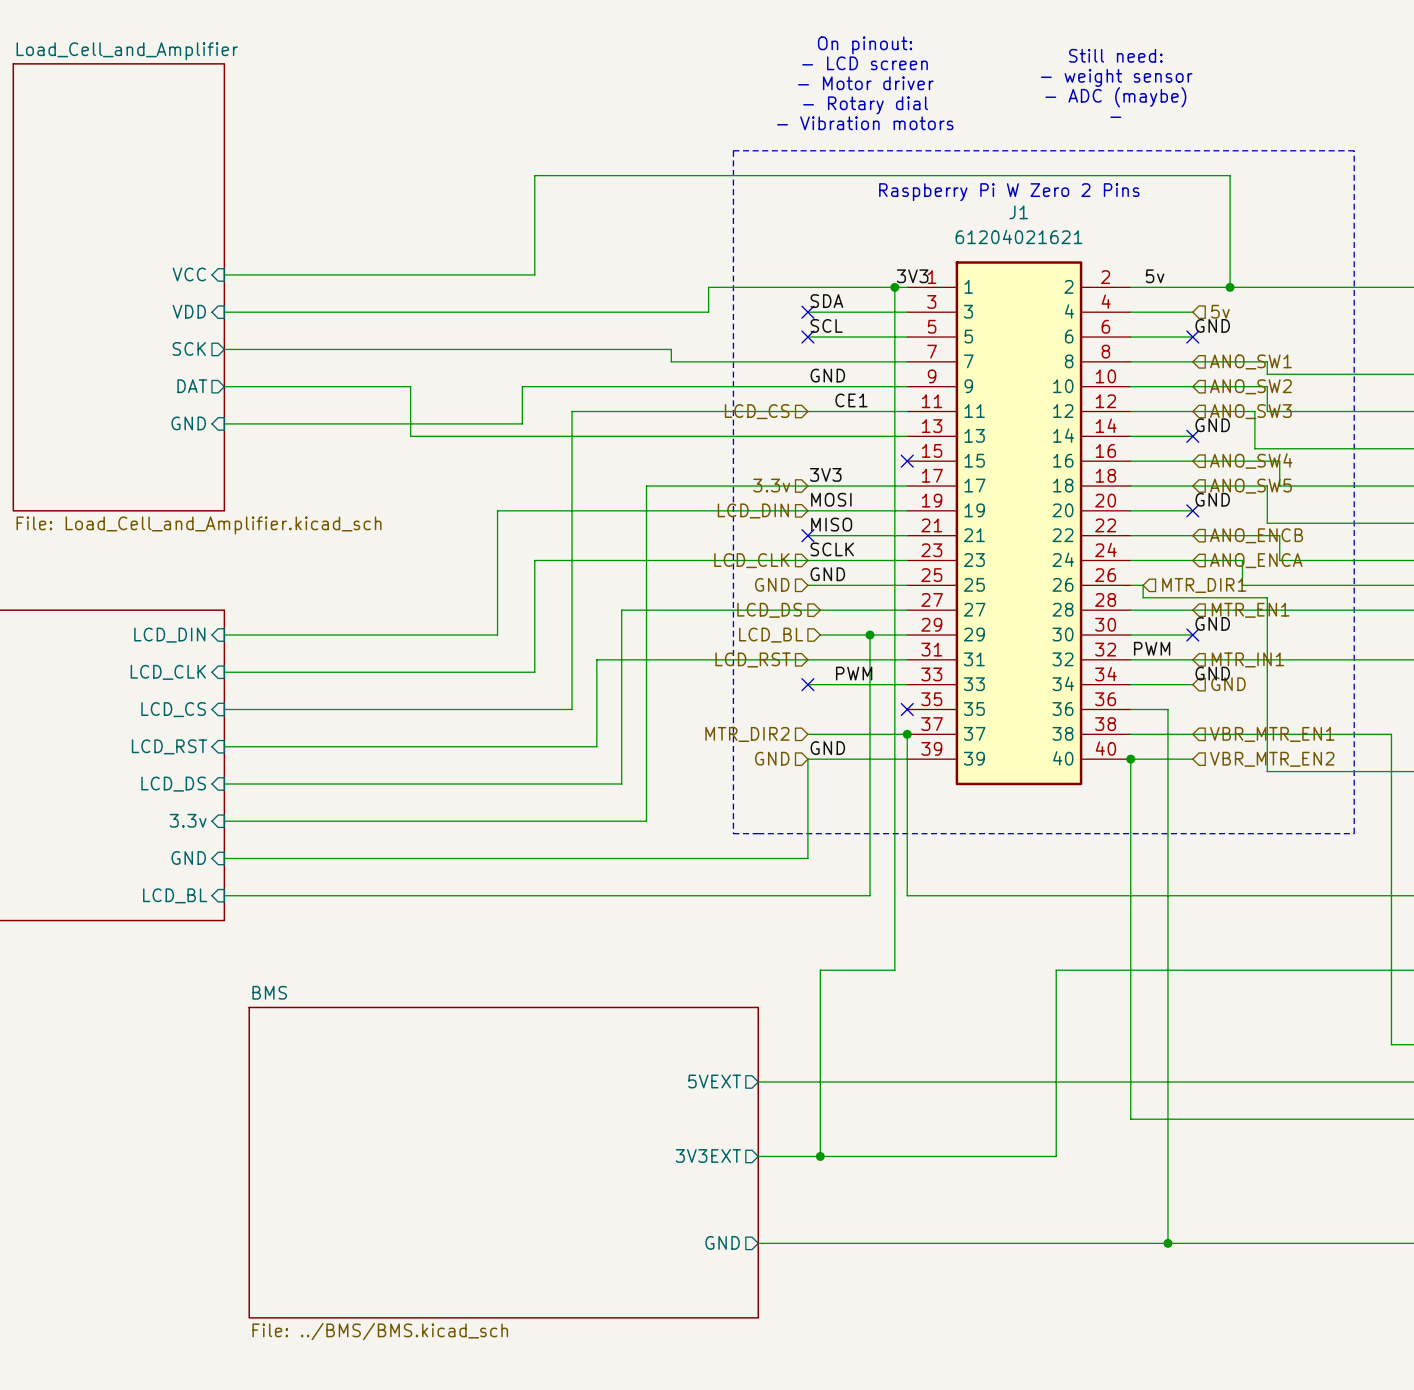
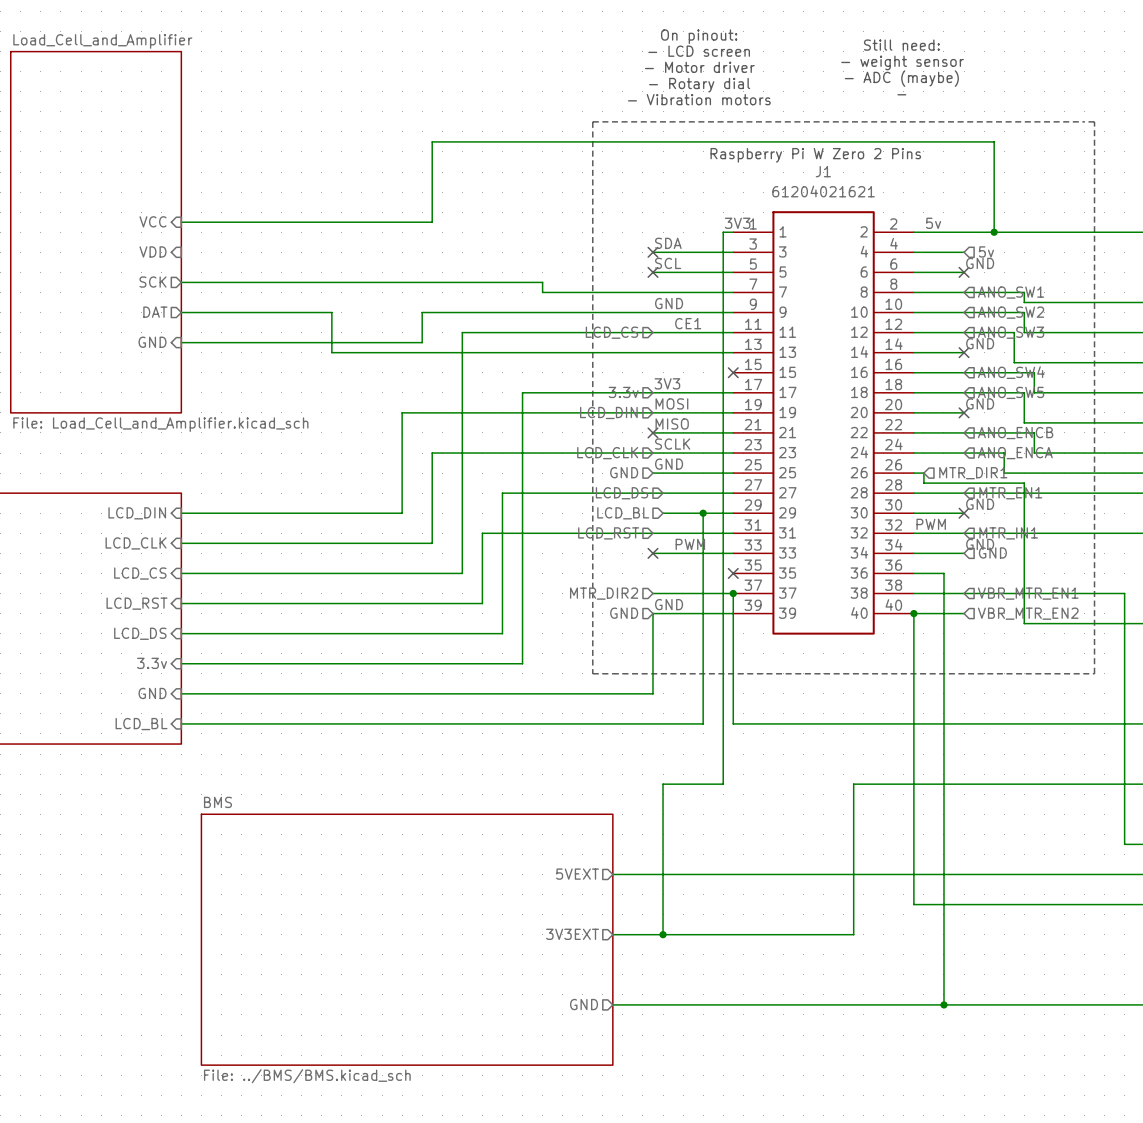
wire: (894, 287) (708, 287) (708, 312) (224, 312) -> none
junction: (894, 287) -> none

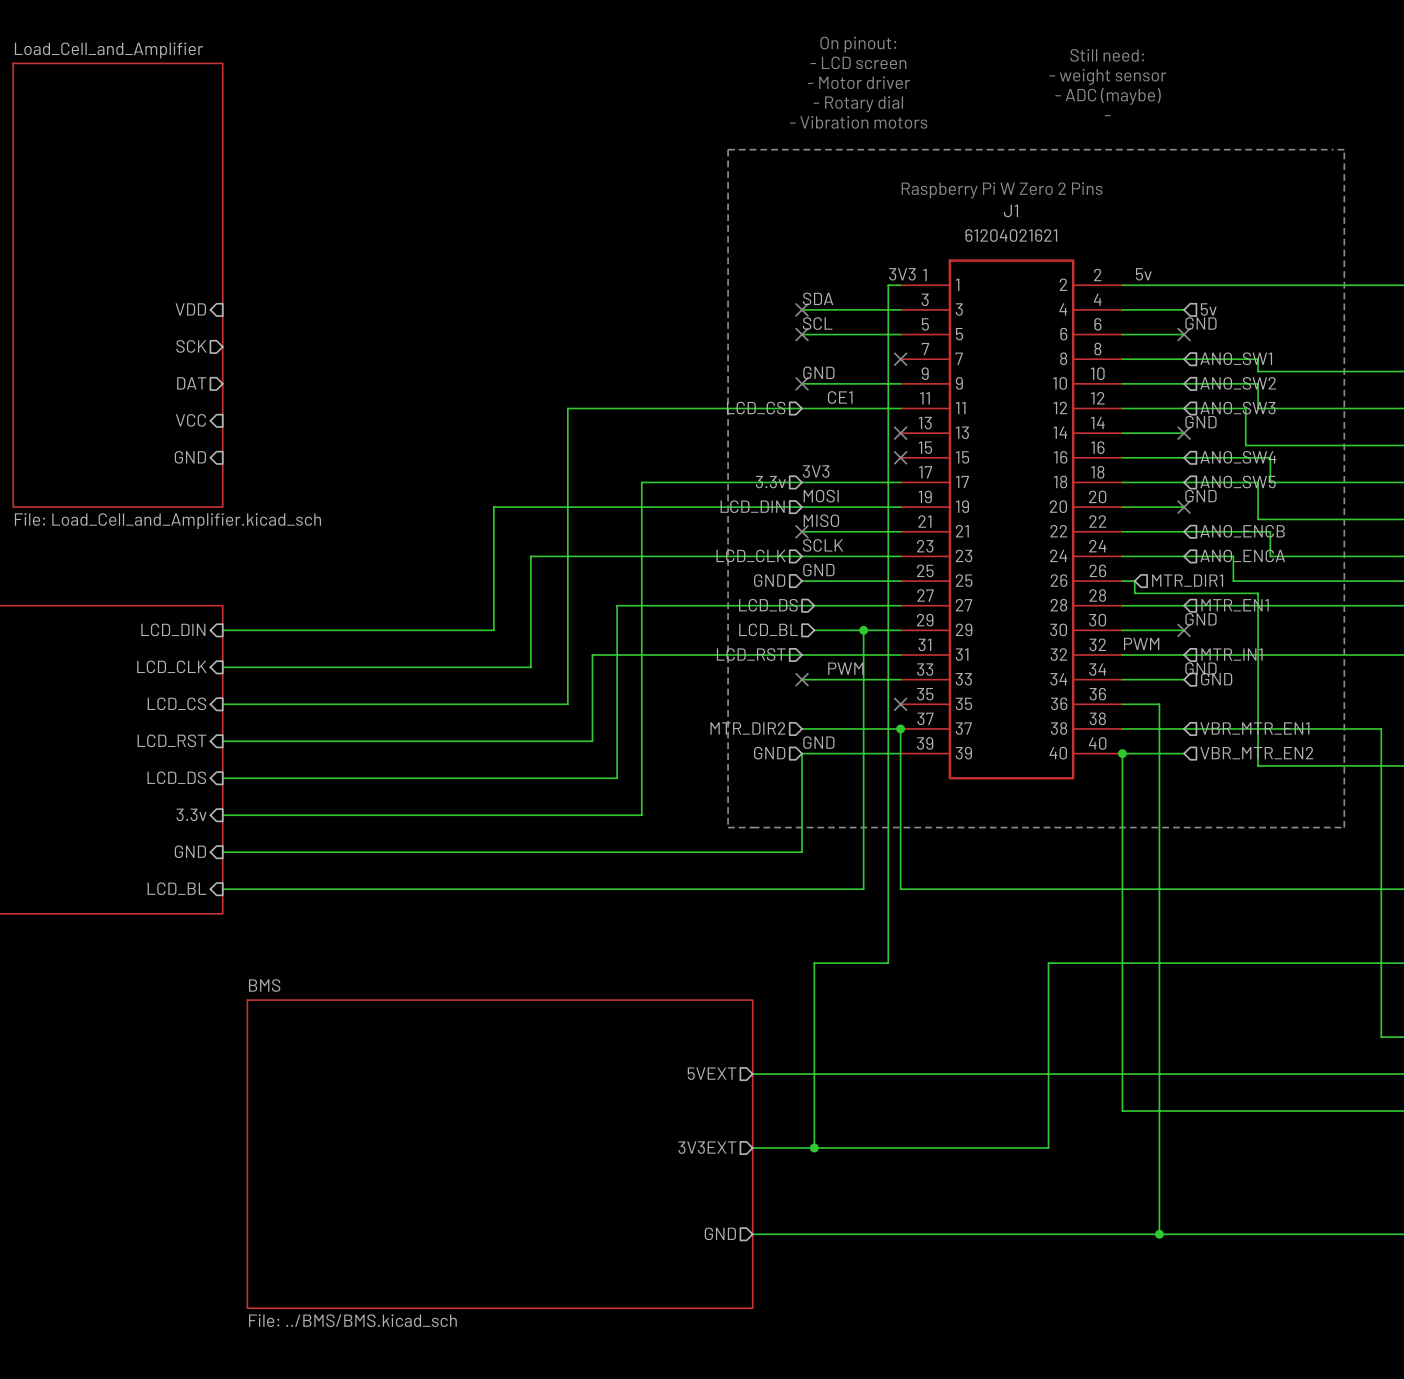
sheet pin: VCC (153, 221) -> none
wire: (181, 222) (432, 222) (432, 141) (994, 141) (994, 232) -> none
junction: (994, 232) -> none
wire: (181, 282) (542, 282) (542, 292) (733, 292) -> none
no-connect mark: none -> (900, 359)
wire: (181, 312) (331, 312) (331, 352) (733, 352) -> none
wire: (652, 312) (422, 312) (422, 342) (181, 342) -> none
no-connect mark: none -> (802, 383)
sheet pin: GND (152, 342) -> VCC (190, 420)
no-connect mark: none -> (900, 433)
sheet pin: none -> GND (190, 457)

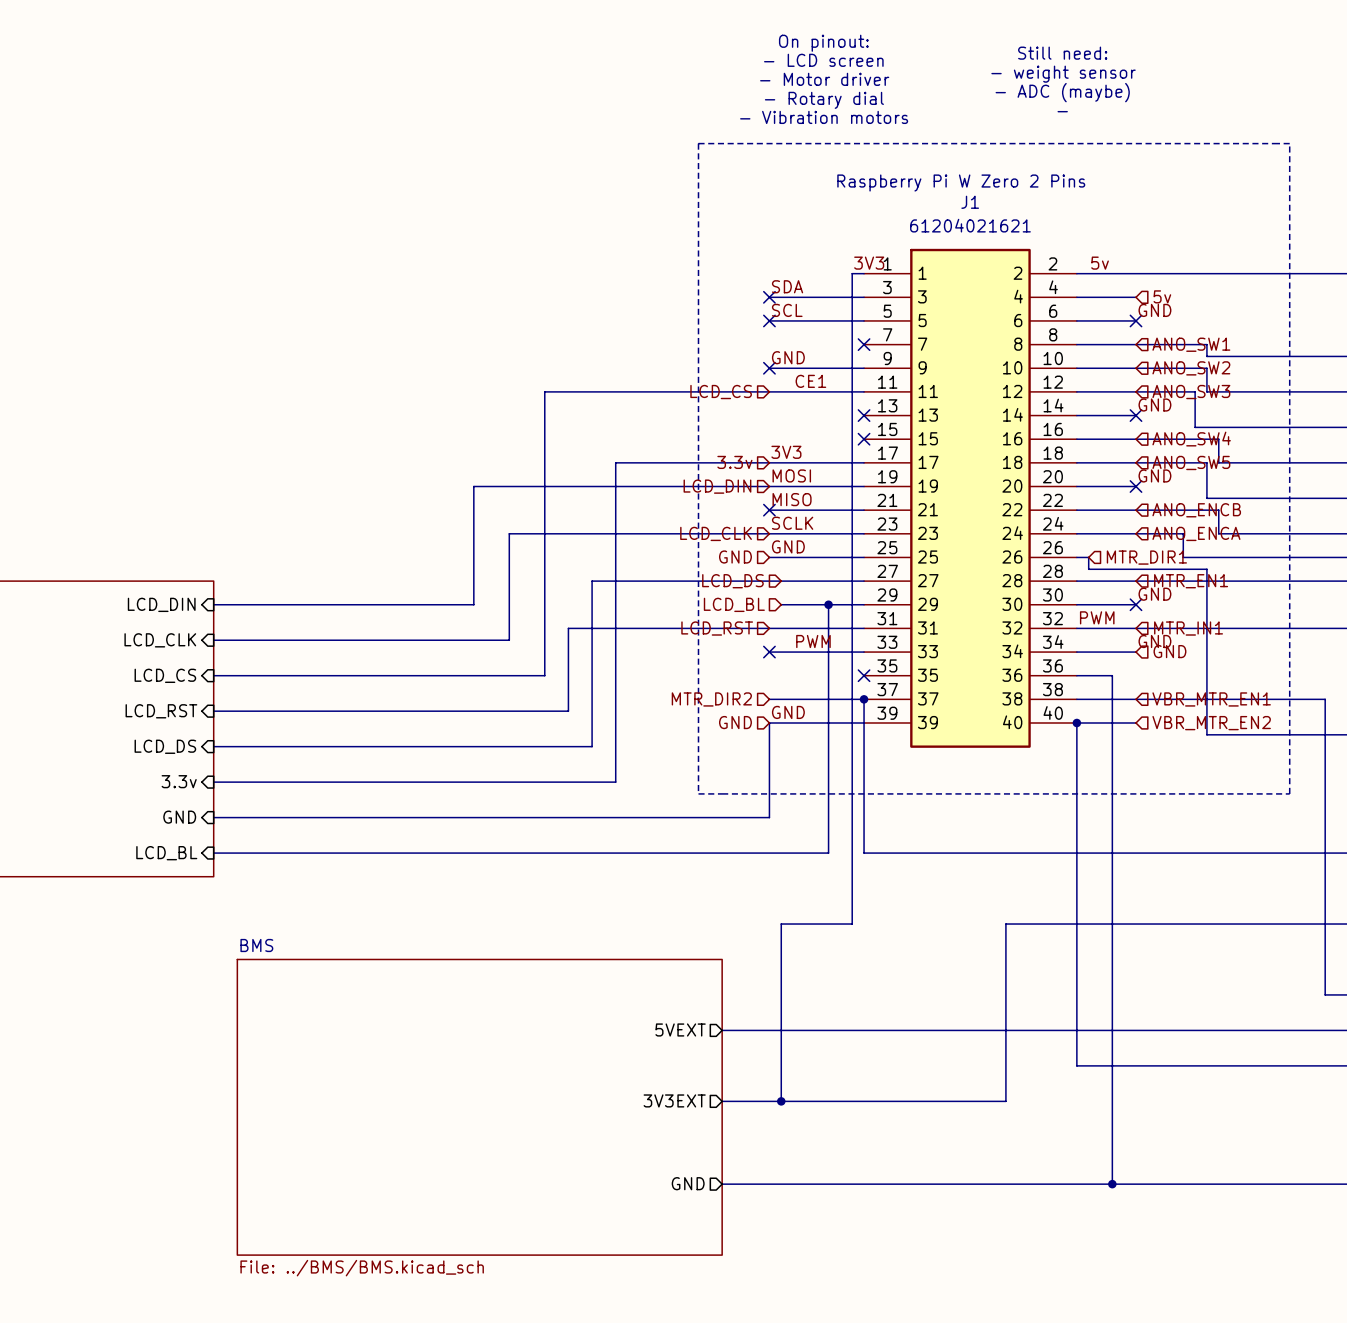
sheet Load_Cell_and_Amplifier: File: Load_Cell_and_Amplifier.kicad_sch (117, 285) -> none
sheet pin: VDD (190, 309) -> none
sheet pin: SCK (191, 346) -> none
sheet pin: DAT (191, 383) -> none
sheet pin: VCC (190, 420) -> none
sheet pin: GND (190, 457) -> none

